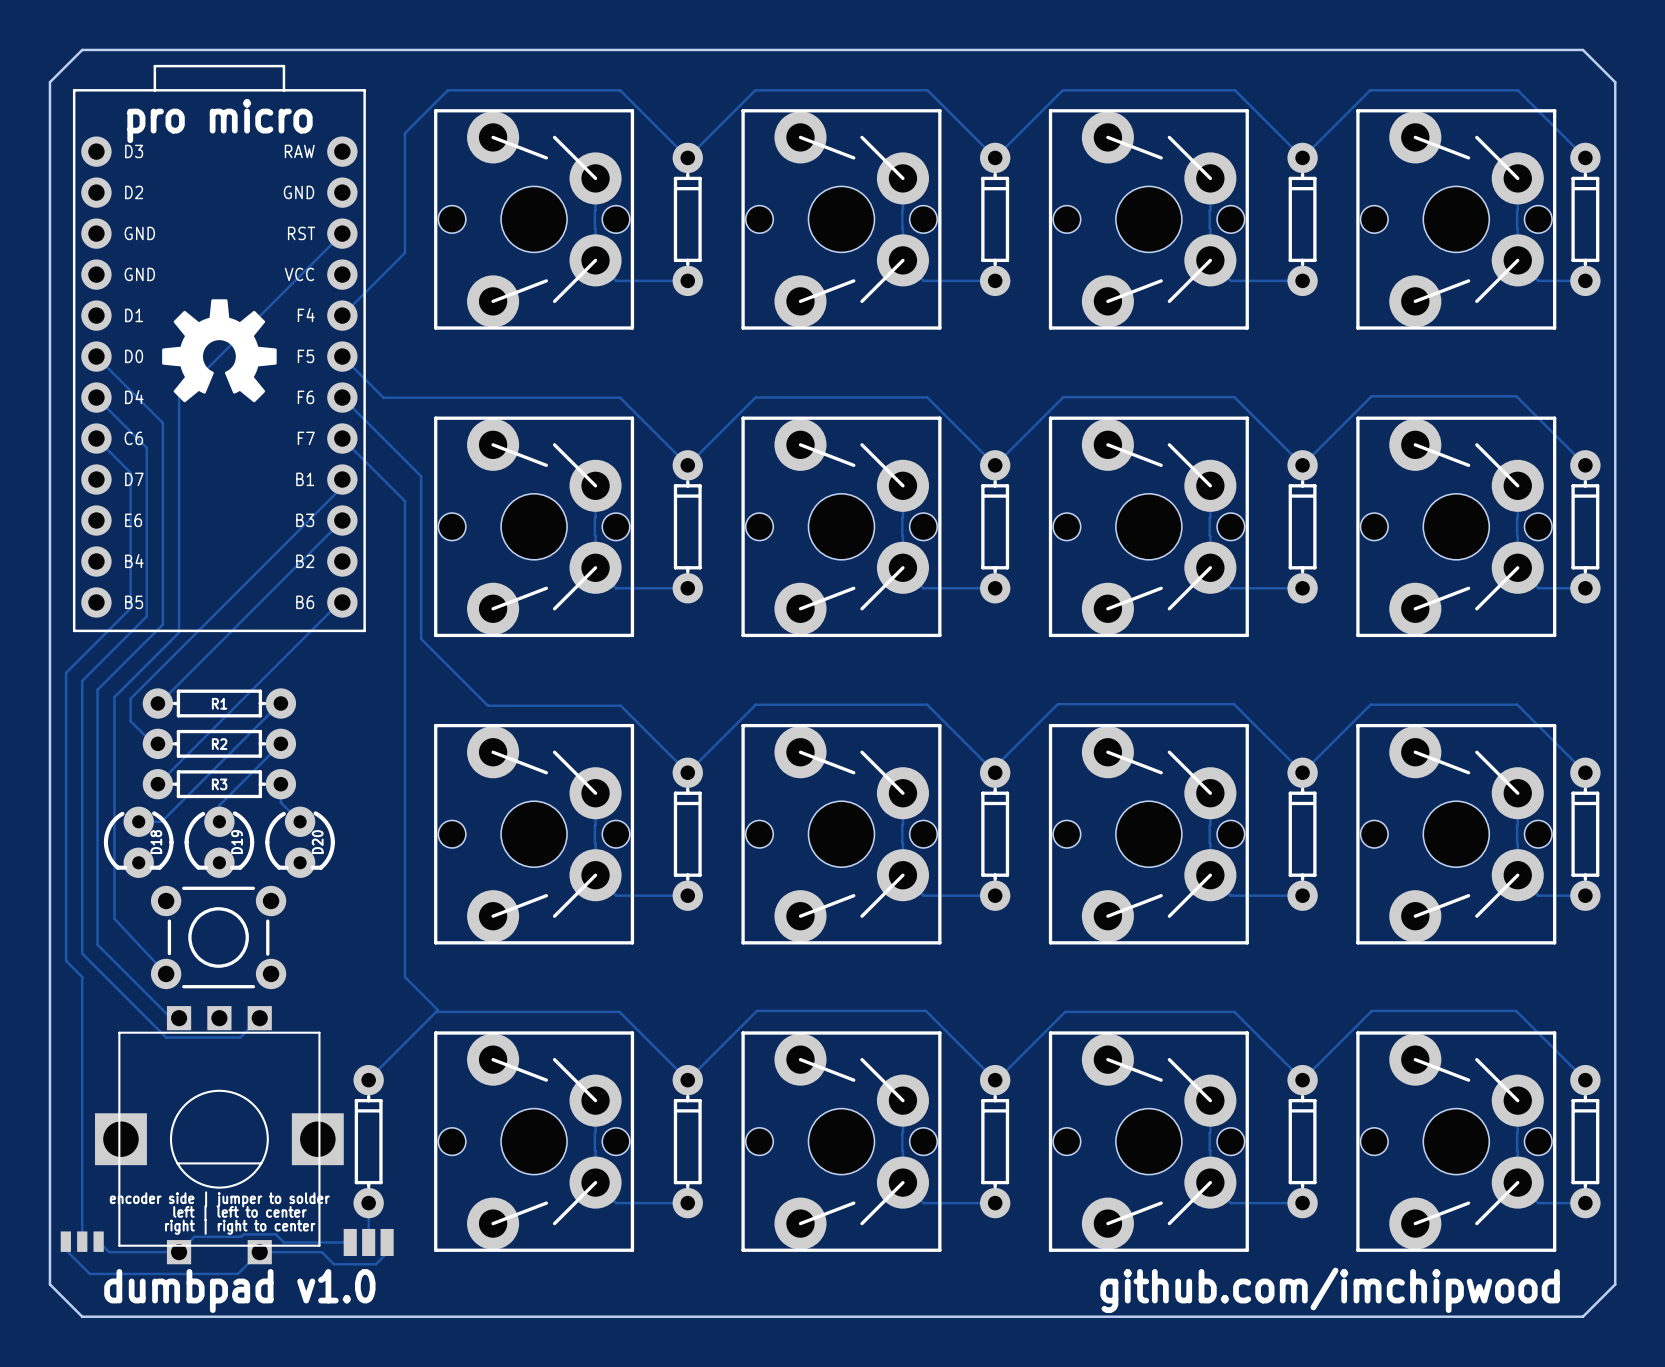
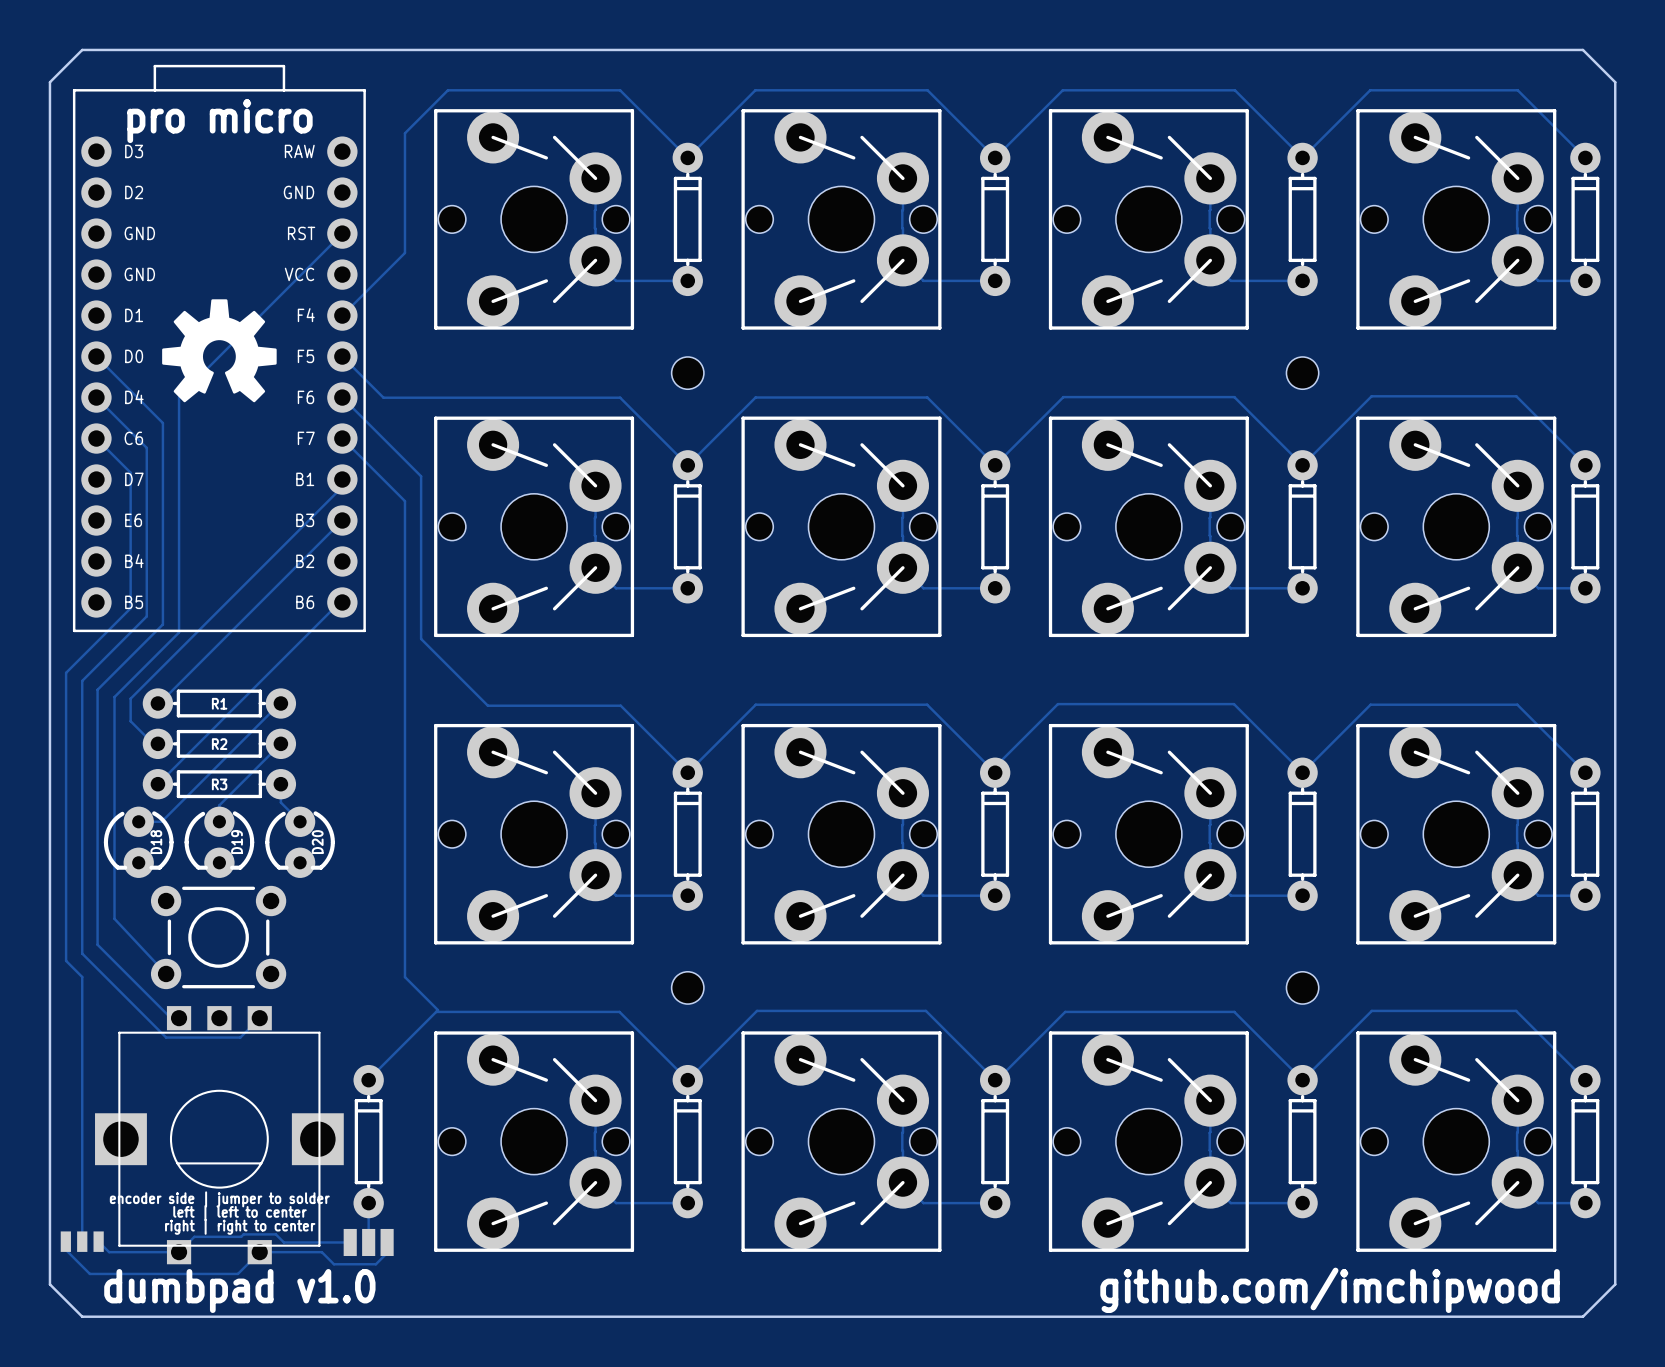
hole: none -> (687, 373)
hole: none -> (1302, 373)
hole: none -> (687, 987)
hole: none -> (1302, 987)

